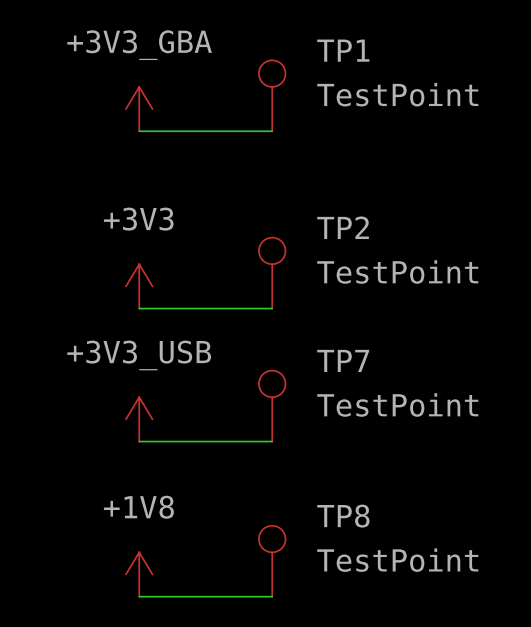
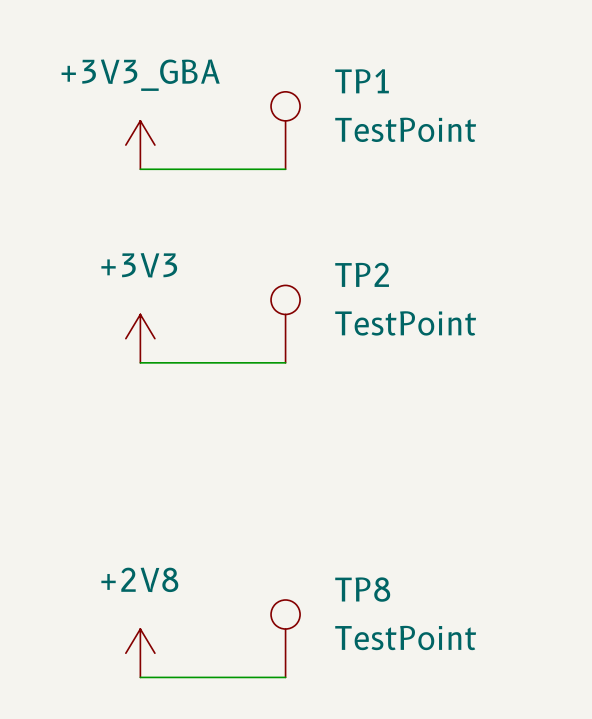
TP7: TestPoint (272, 406) -> none
power symbol: +3V3_USB (139, 419) -> none
wire: (139, 441) (272, 441) -> none
power symbol: +1V8 (139, 574) -> +2V8 (140, 653)

